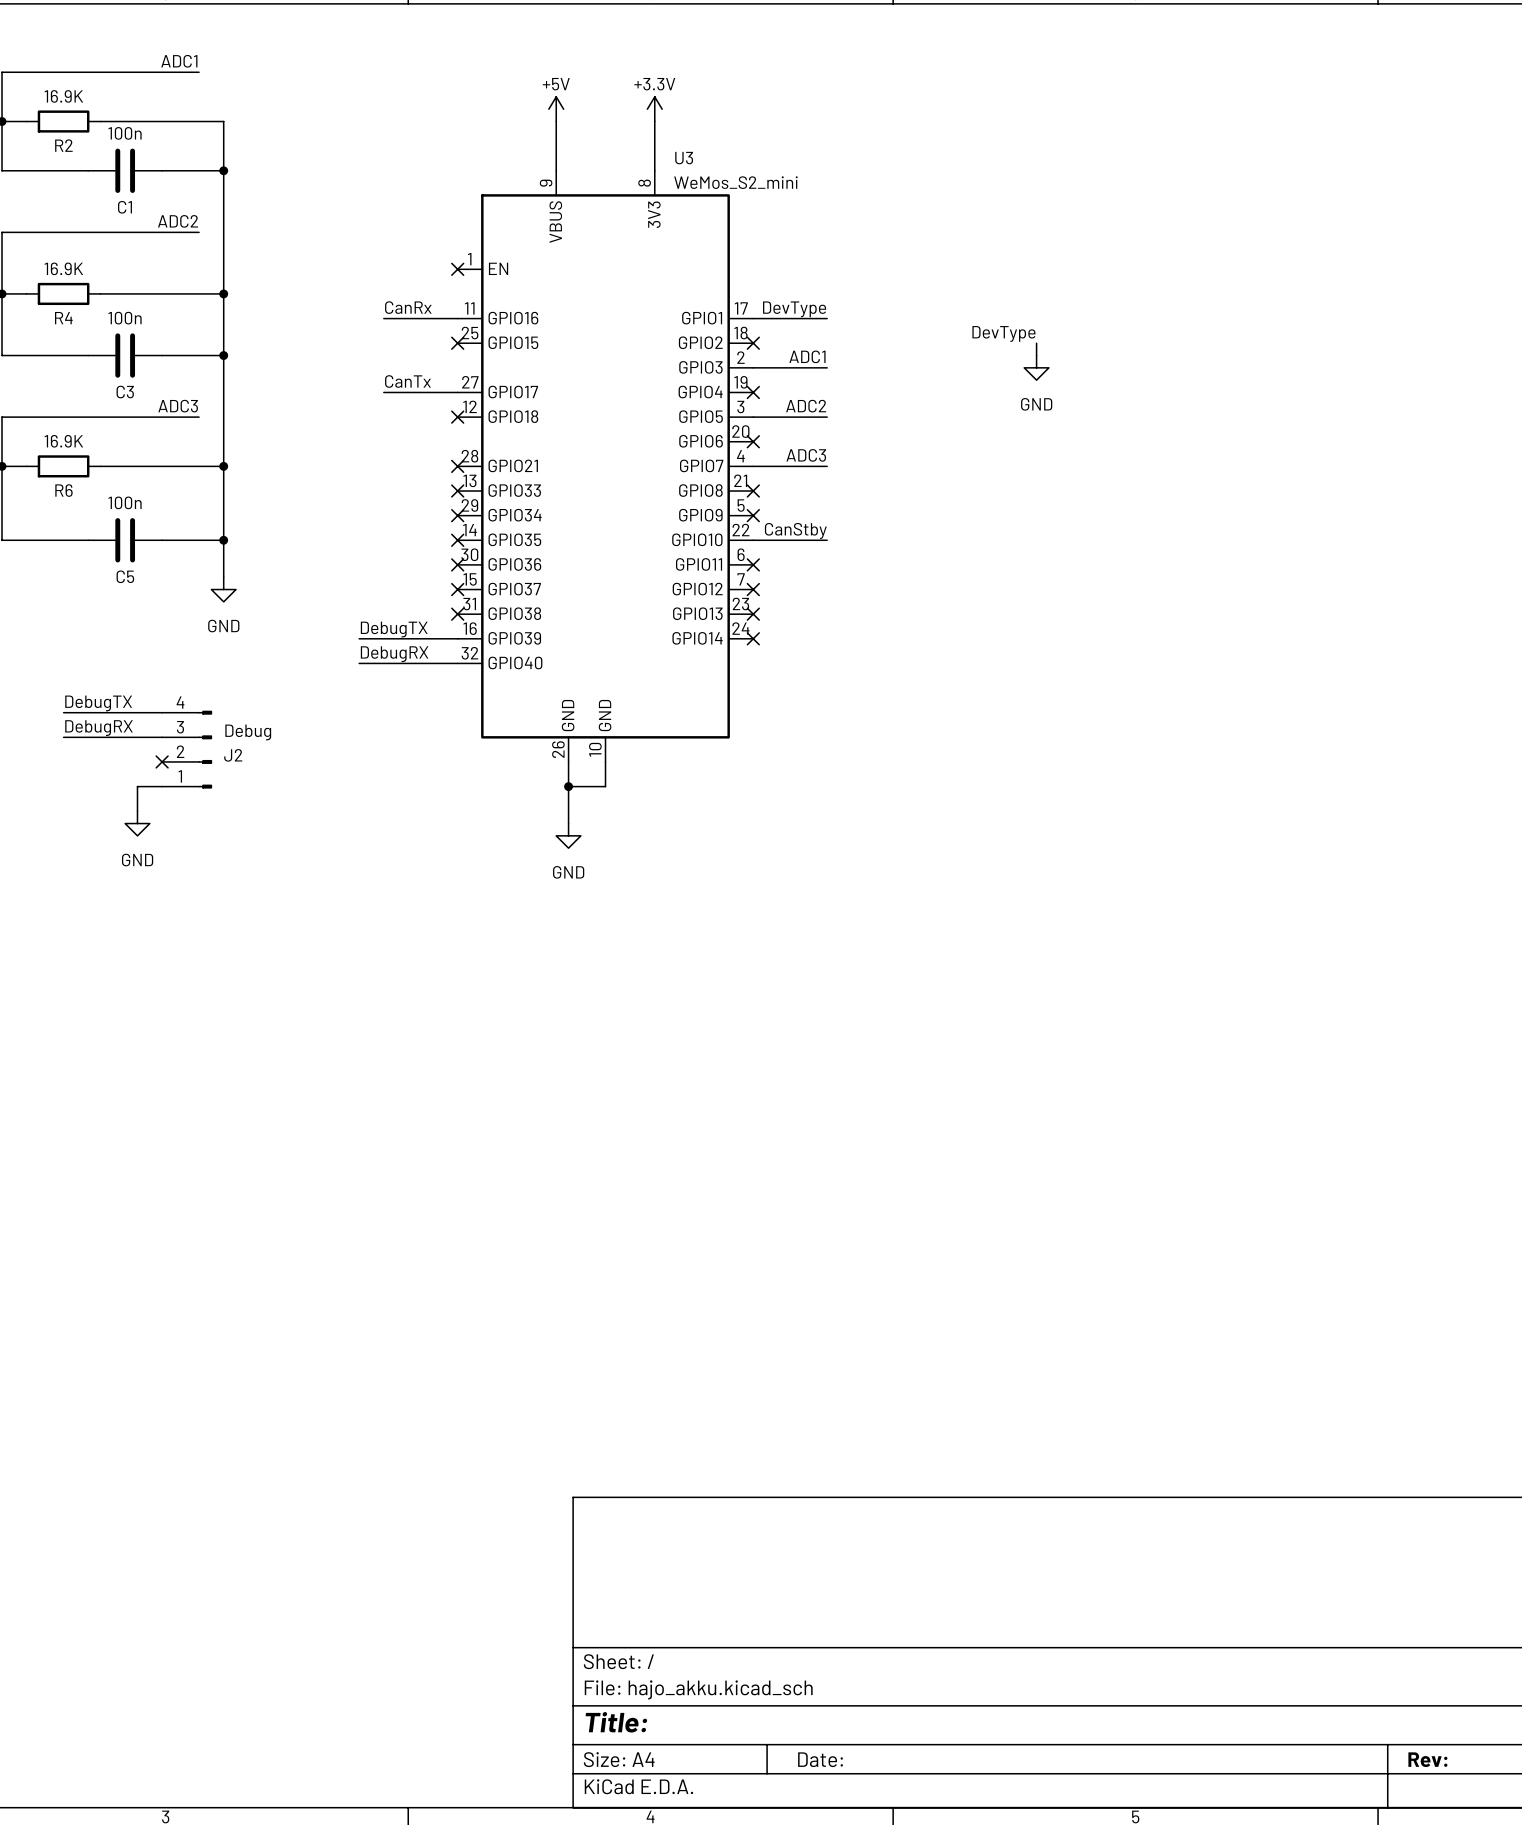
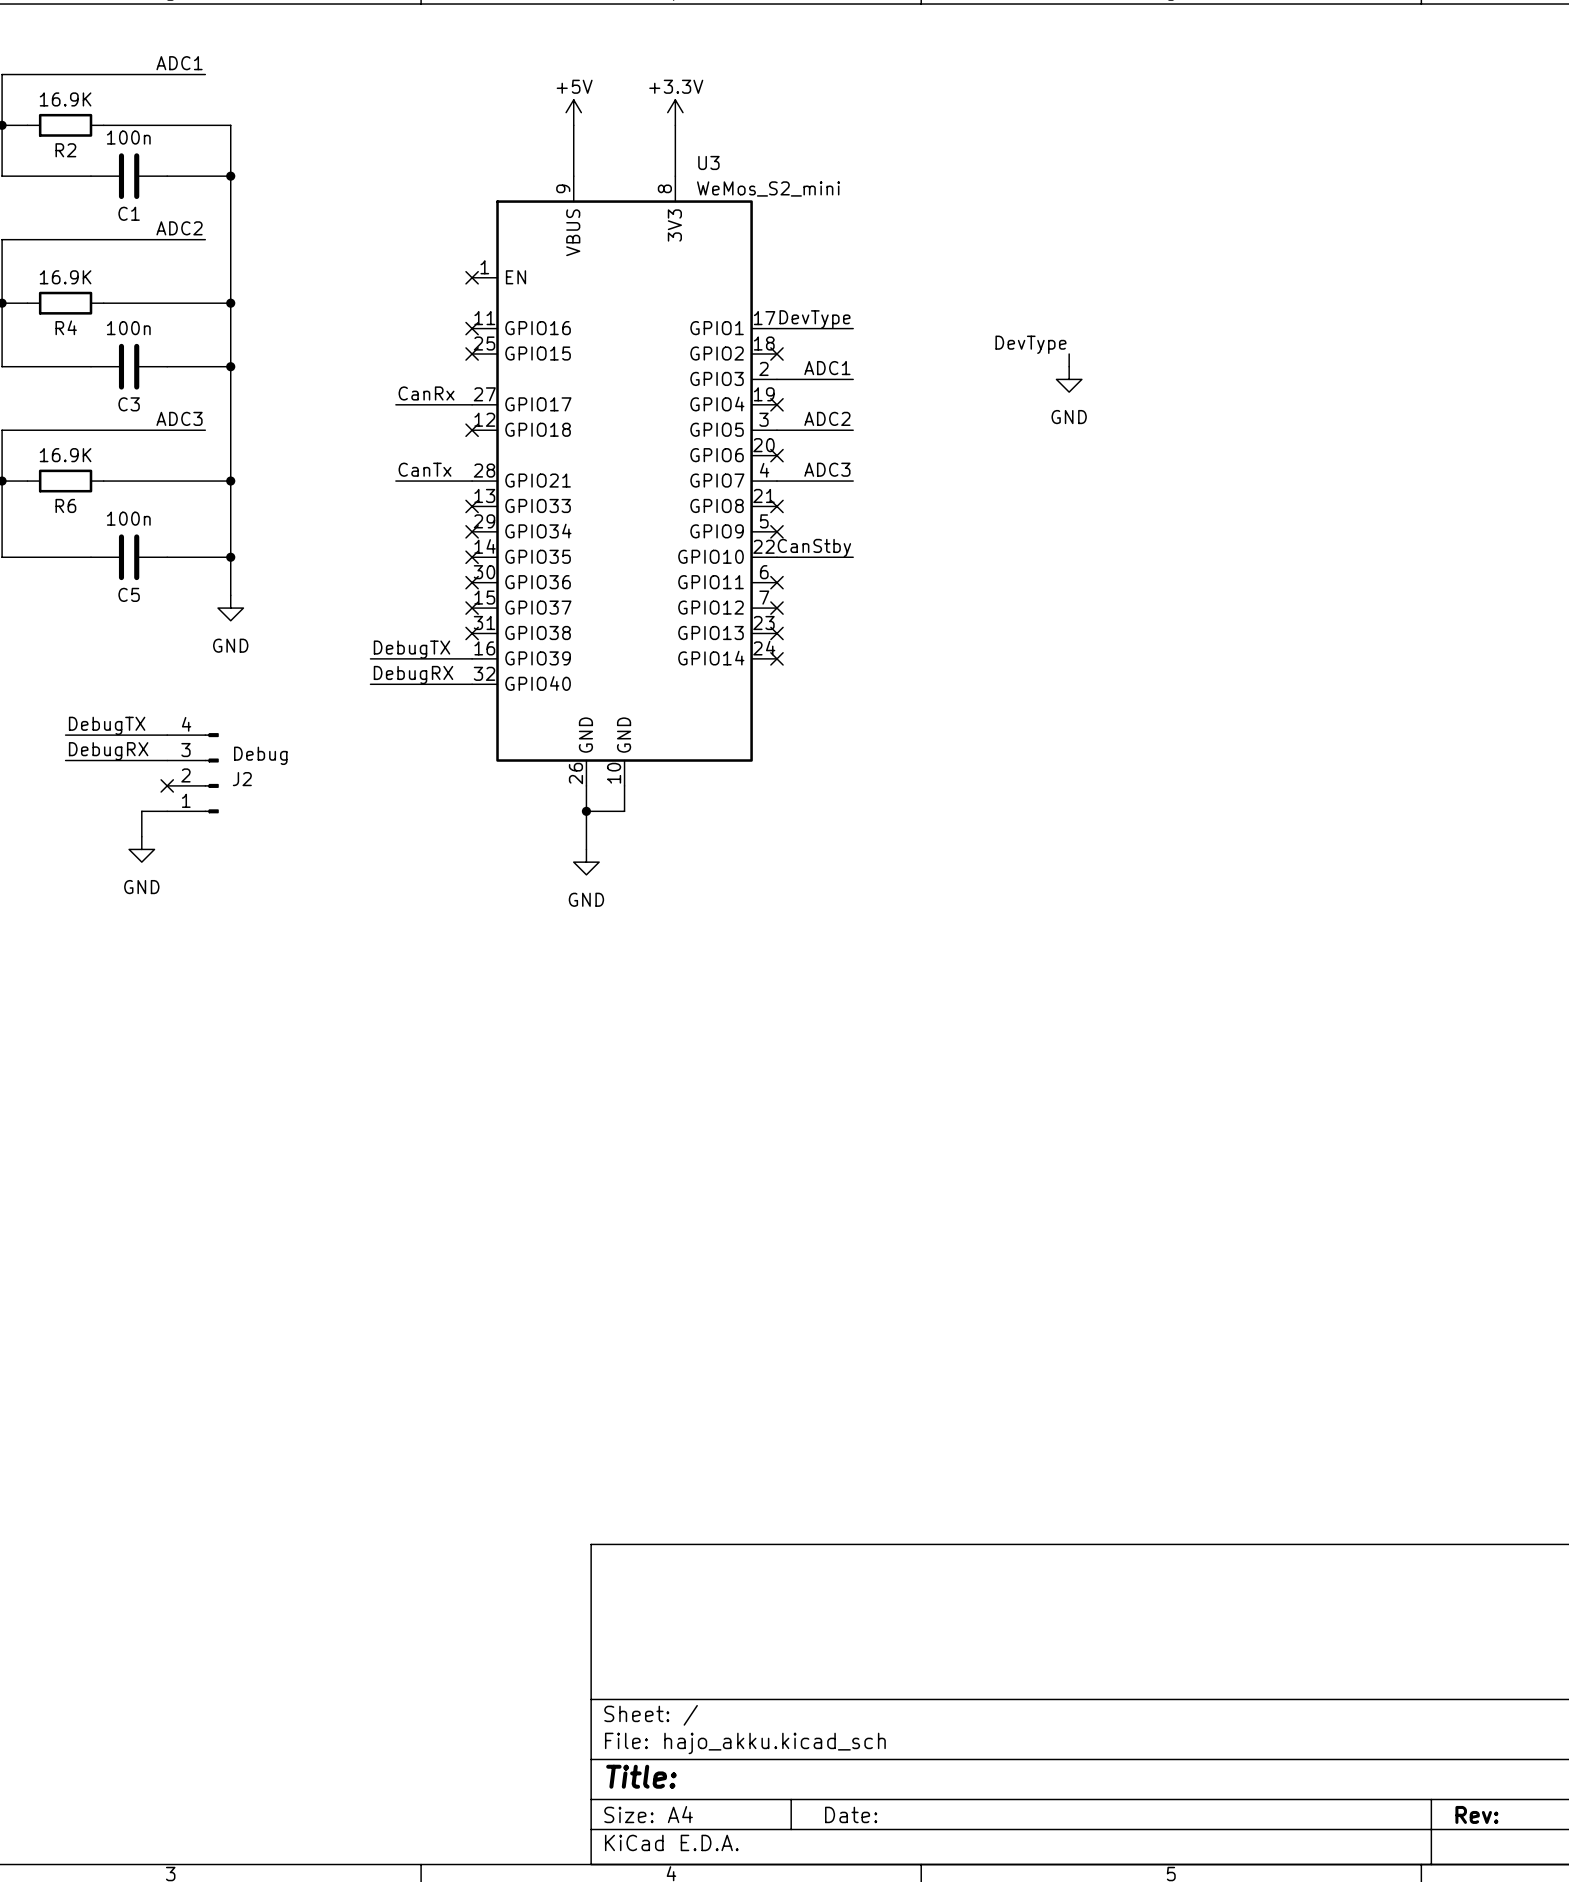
label: CanRx (408, 307) -> none
wire: (383, 318) (457, 318) -> (395, 481) (472, 481)
no-connect mark: none -> (472, 328)
label: CanTx (407, 381) -> CanRx (426, 393)
label: none -> CanTx (425, 469)
no-connect mark: (457, 466) -> none

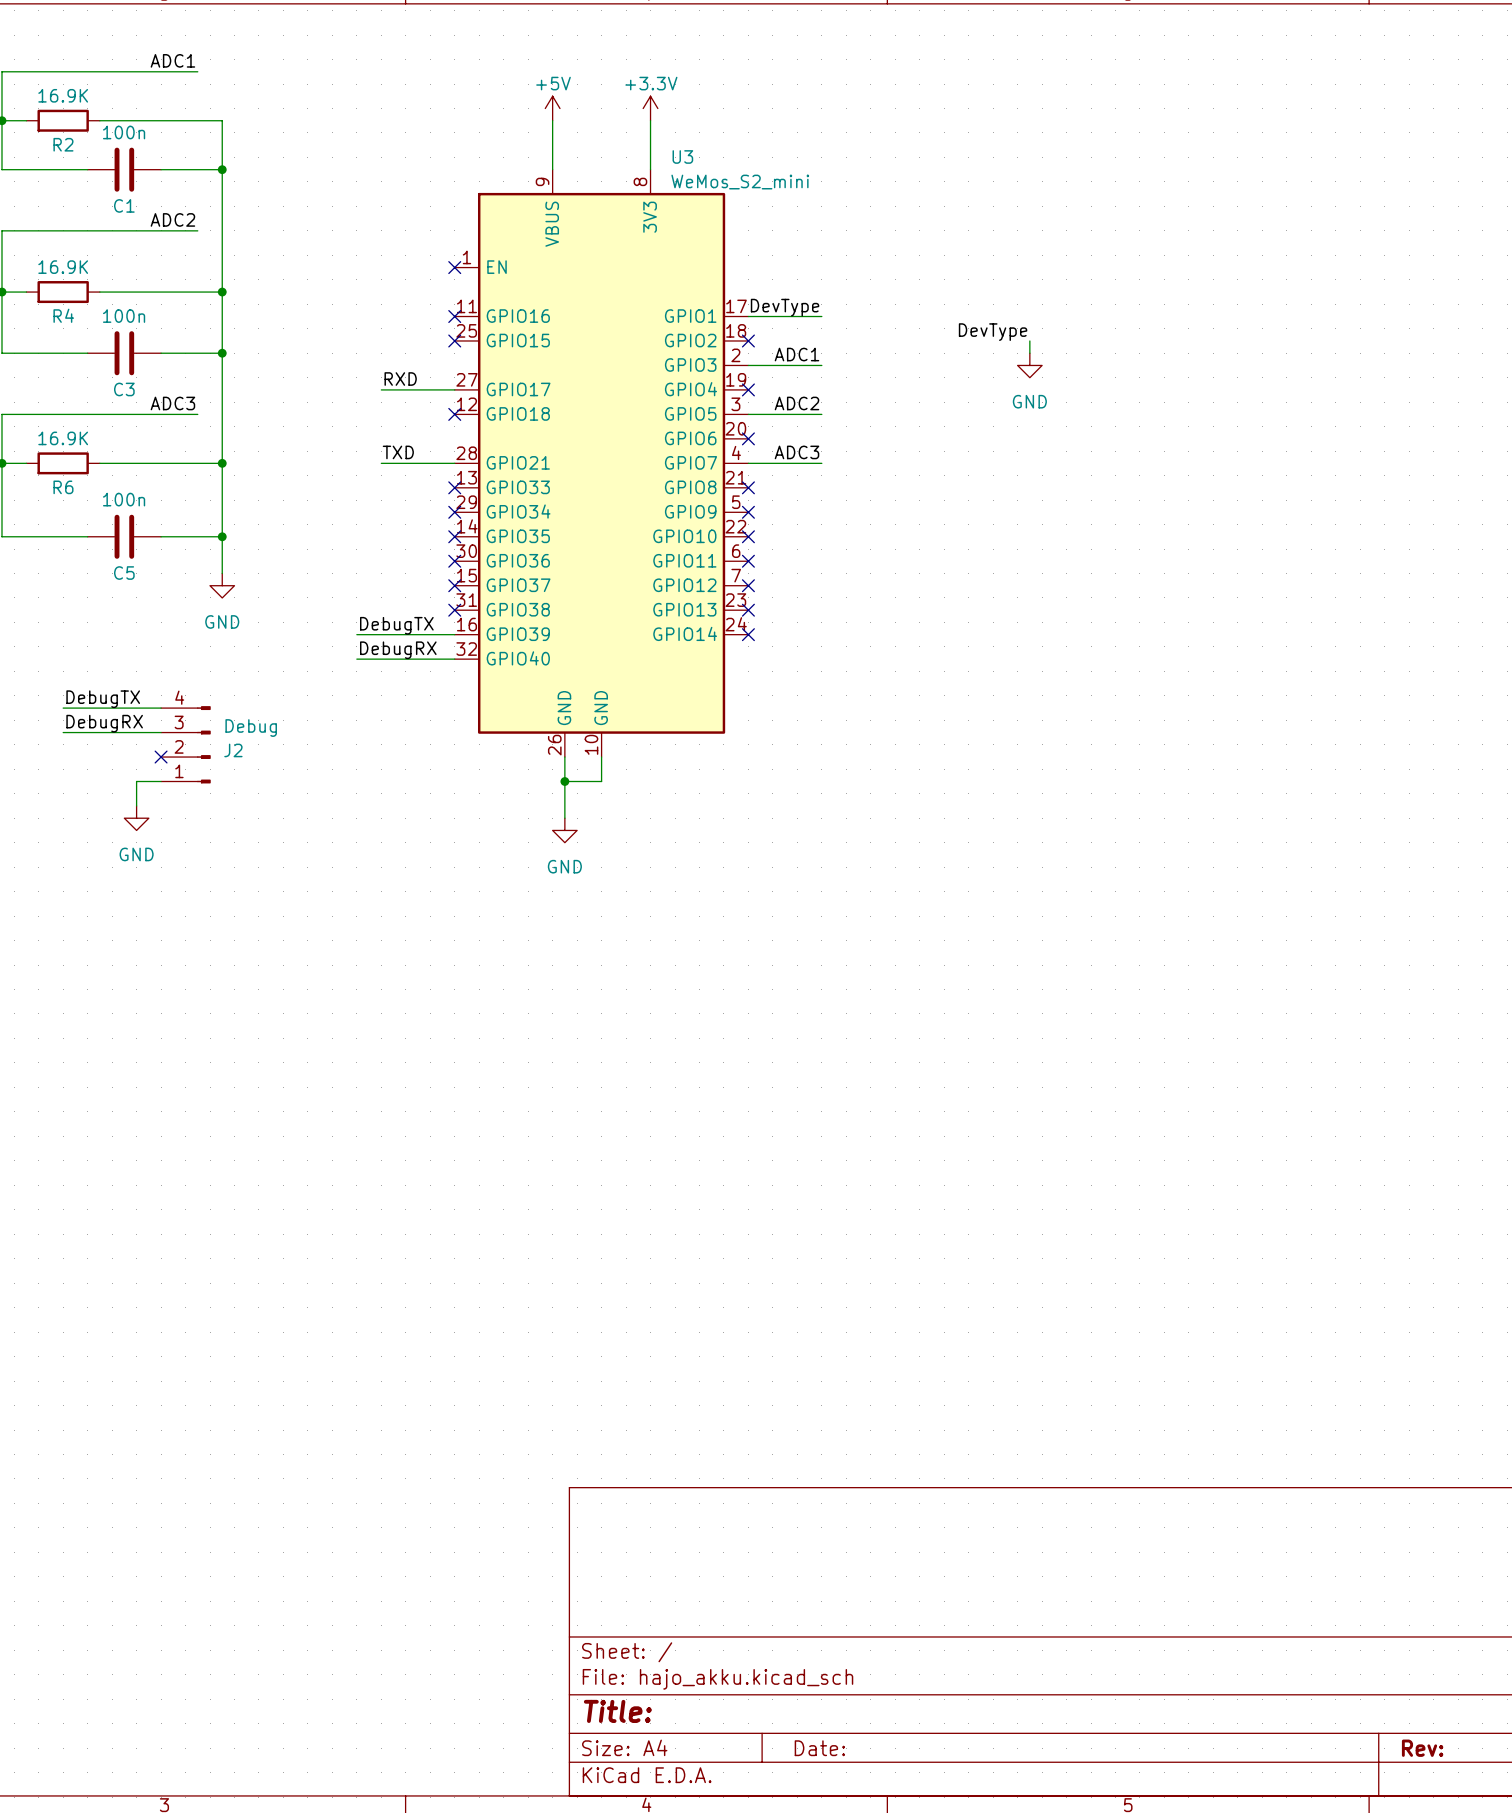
label: CanRx (426, 393) -> RXD (400, 379)
label: CanTx (425, 469) -> TXD (398, 452)
label: CanStby (814, 548) -> none
wire: (776, 557) (853, 557) -> none
no-connect mark: none -> (748, 536)

